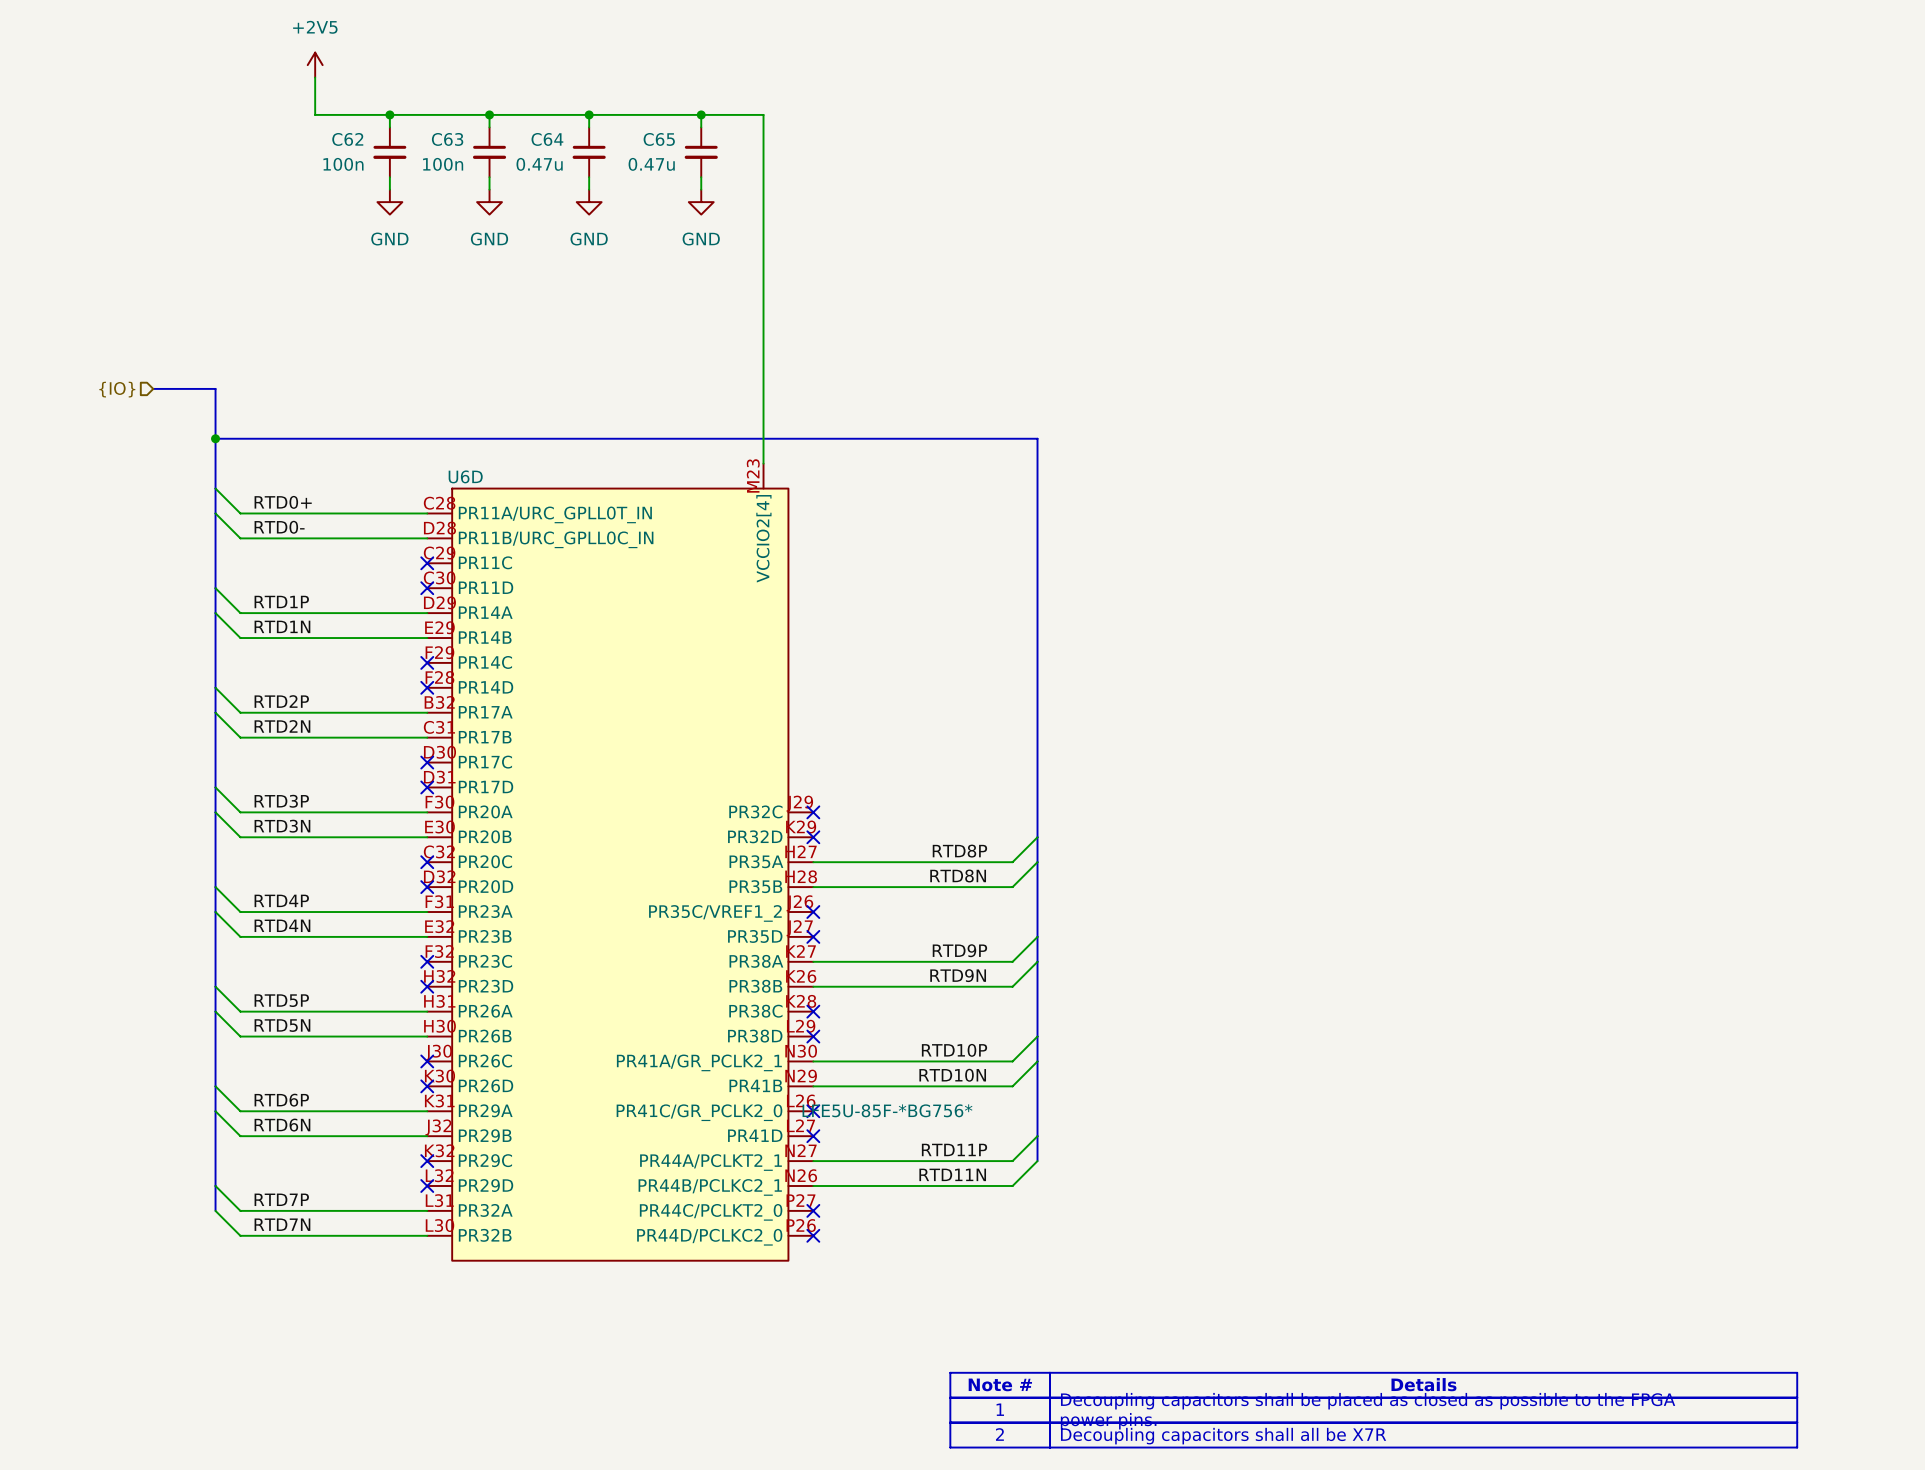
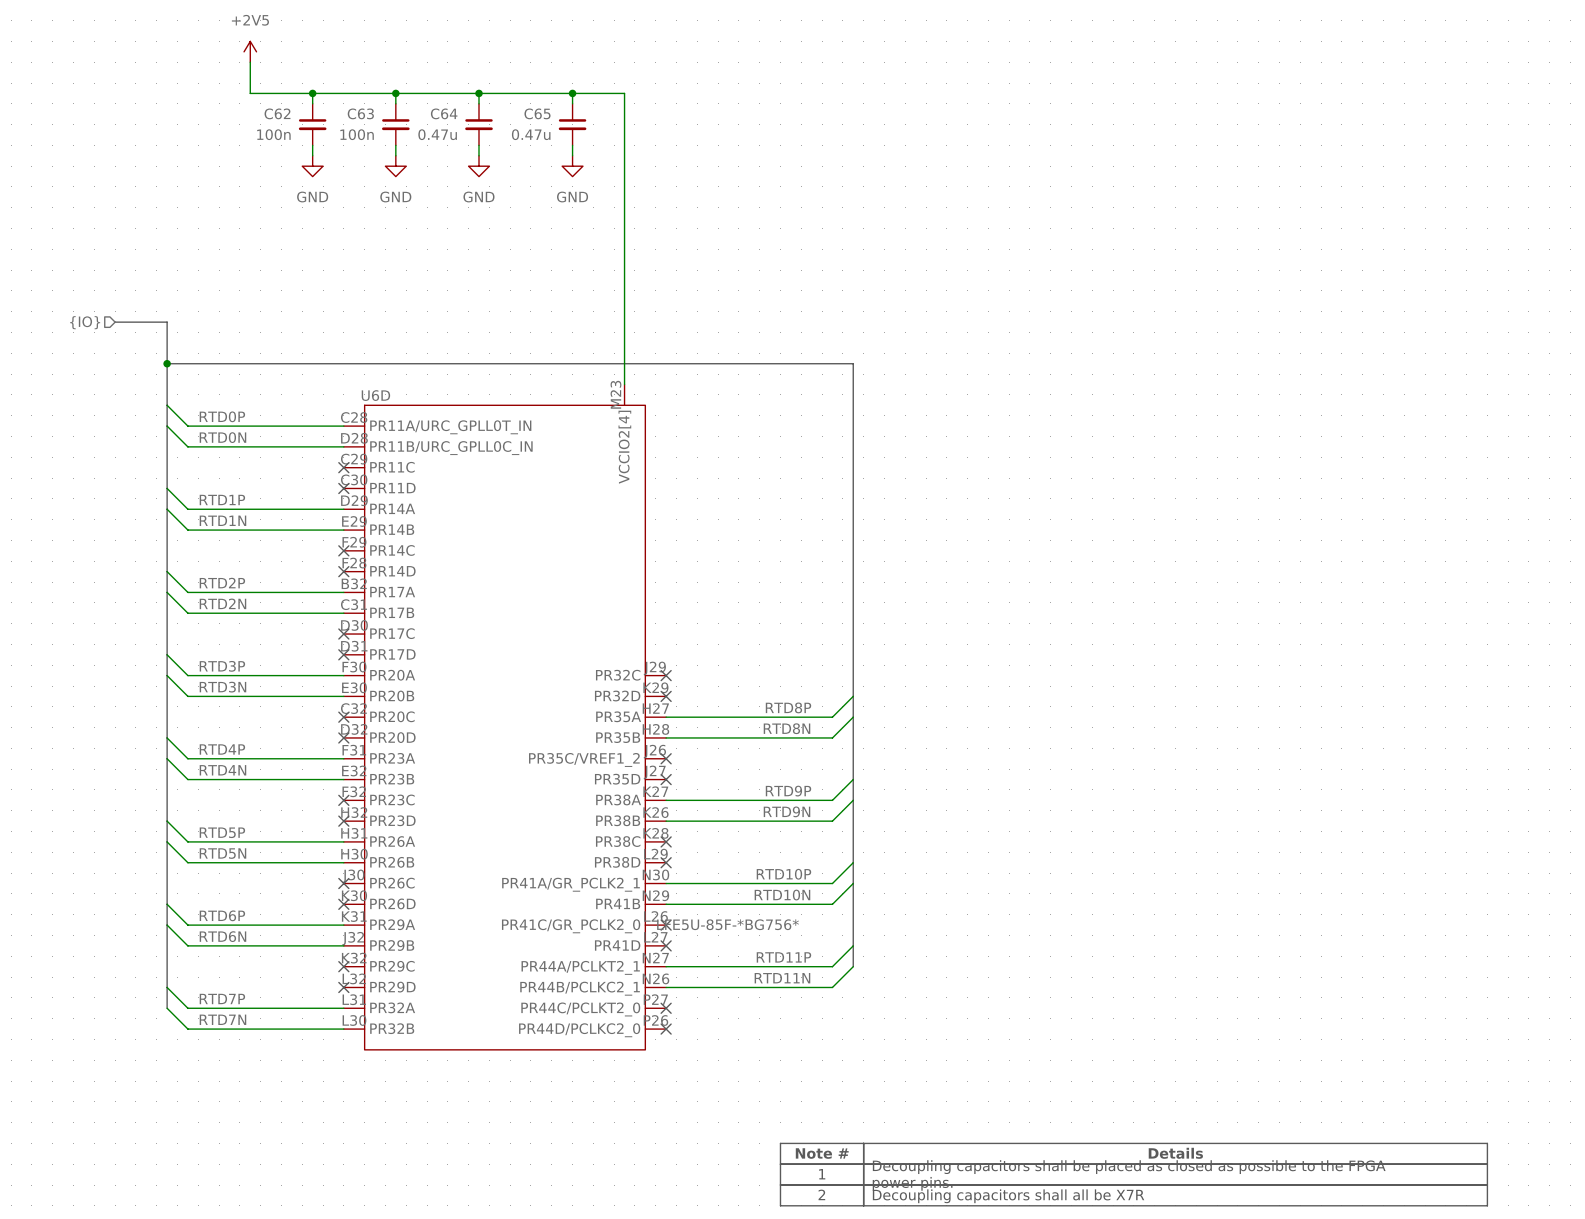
label: RTD0+ (283, 502) -> RTD0P (222, 416)
label: RTD0- (279, 527) -> RTD0N (222, 437)

